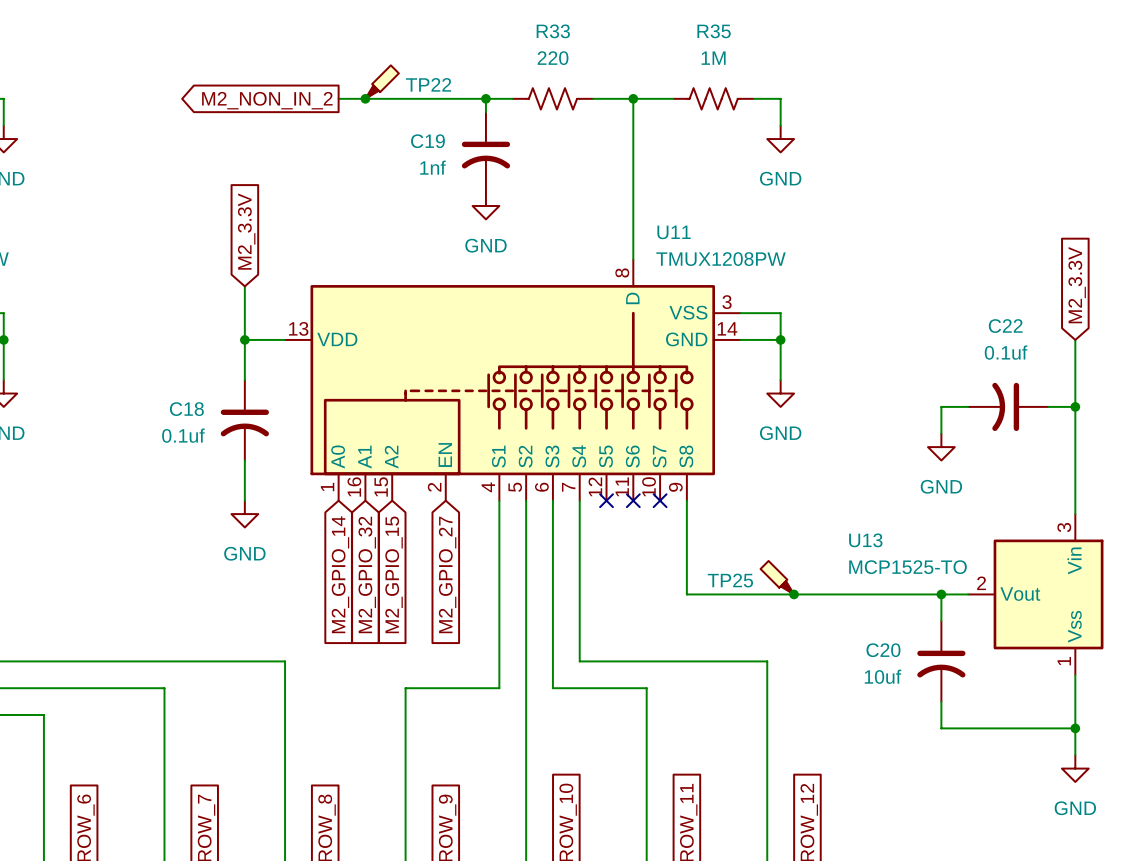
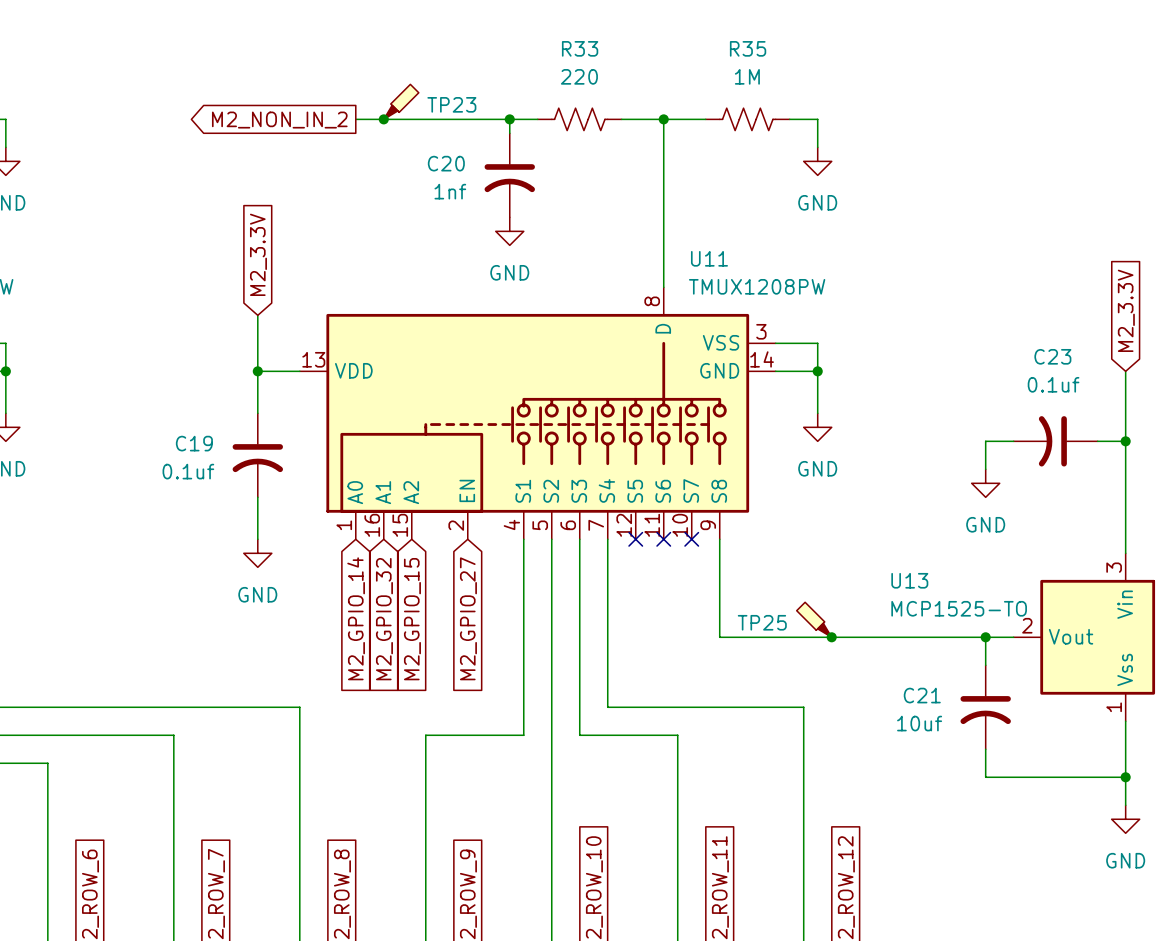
TP22 name: TP22 (428, 84) -> TP23 (451, 104)
C19 name: C19 (427, 141) -> C20 (446, 163)
C22 name: C22 (1005, 326) -> C23 (1052, 356)
C18 name: C18 (186, 409) -> C19 (194, 443)
C20 name: C20 (883, 650) -> C21 (922, 695)

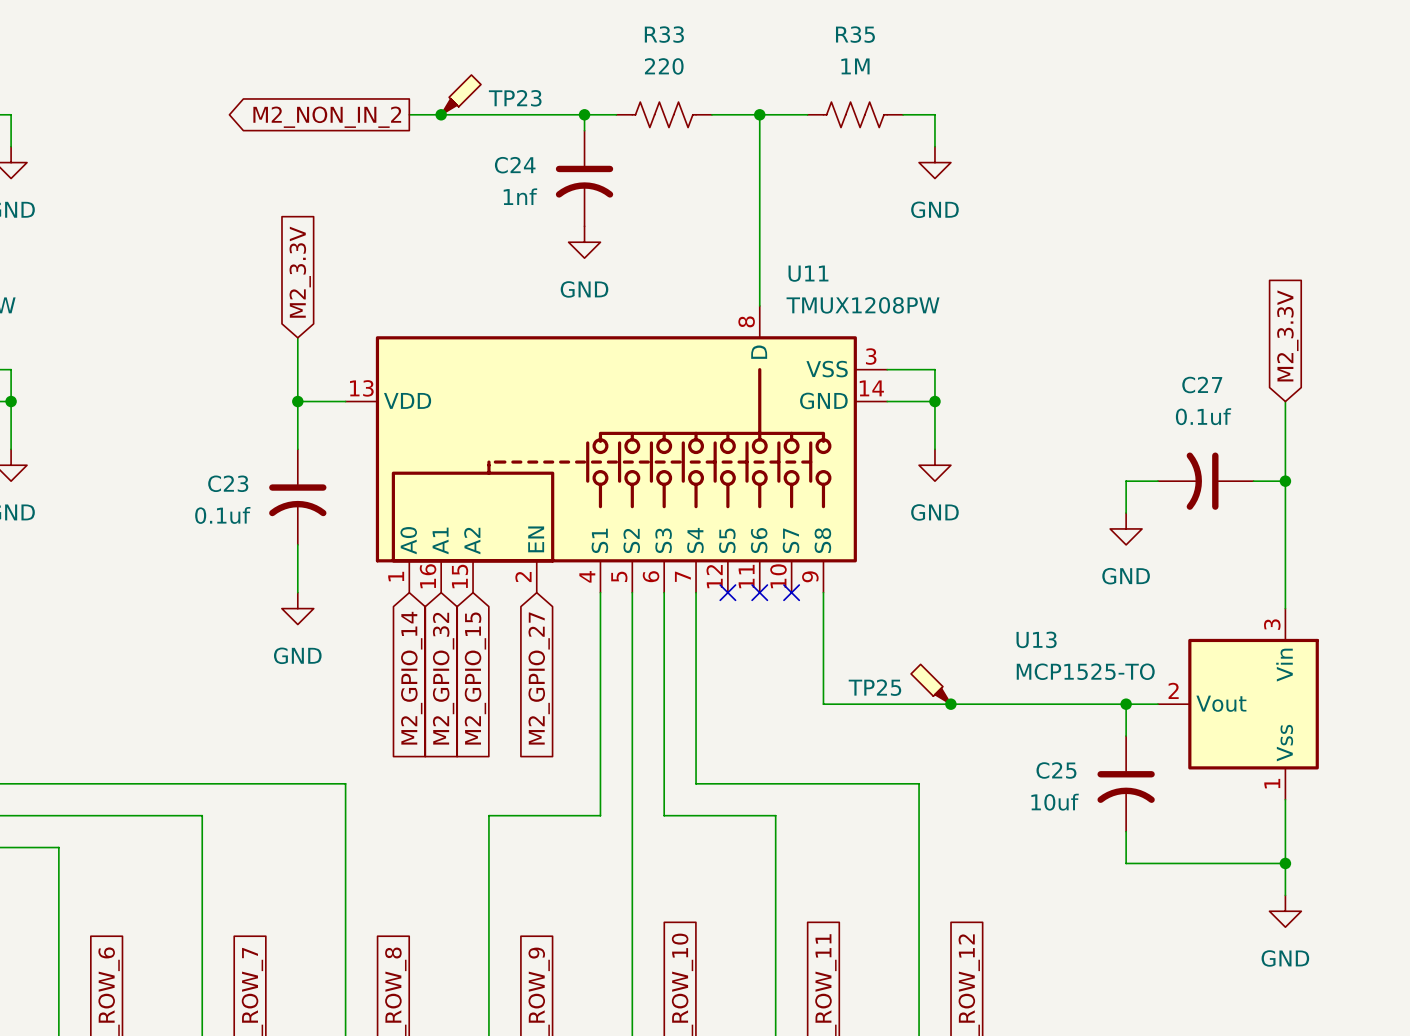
C20 name: C20 (446, 163) -> C24 (515, 165)
C23 name: C23 (1052, 356) -> C27 (1202, 385)
C19 name: C19 (194, 443) -> C23 (228, 483)
C21 name: C21 (922, 695) -> C25 (1056, 770)

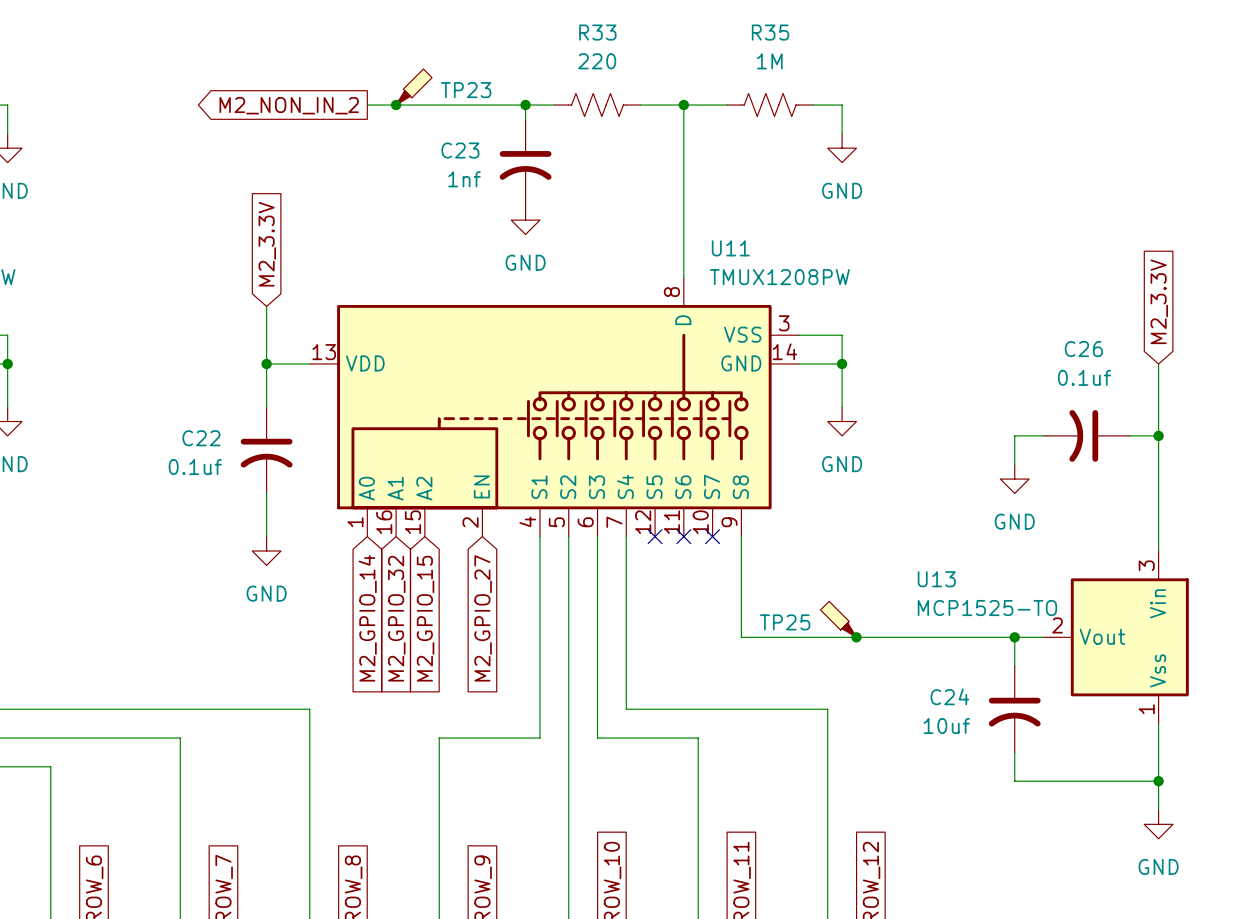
C24 name: C24 (515, 165) -> C23 (460, 150)
C27 name: C27 (1202, 385) -> C26 (1083, 349)
C23 name: C23 (228, 483) -> C22 (201, 438)
C25 name: C25 (1056, 770) -> C24 (949, 696)

